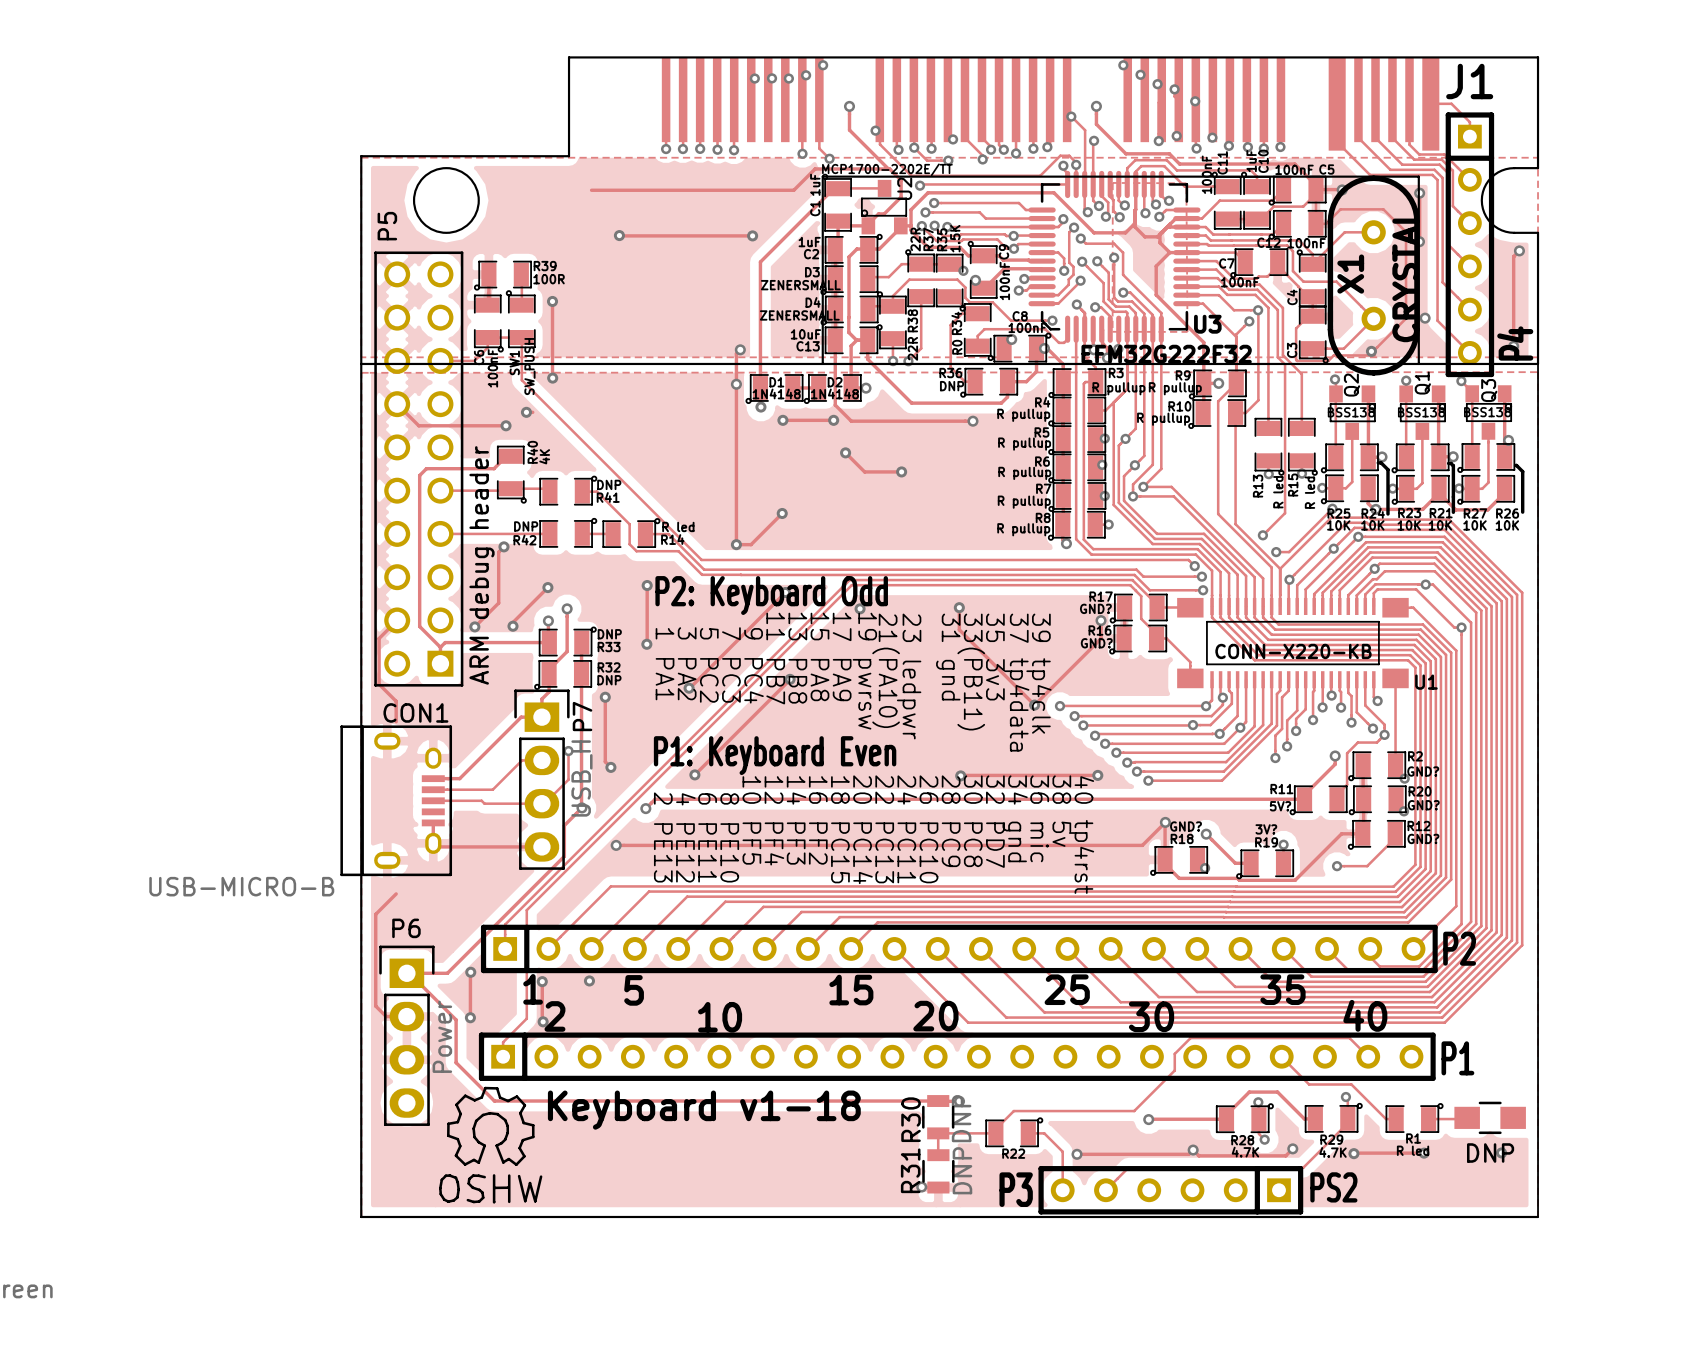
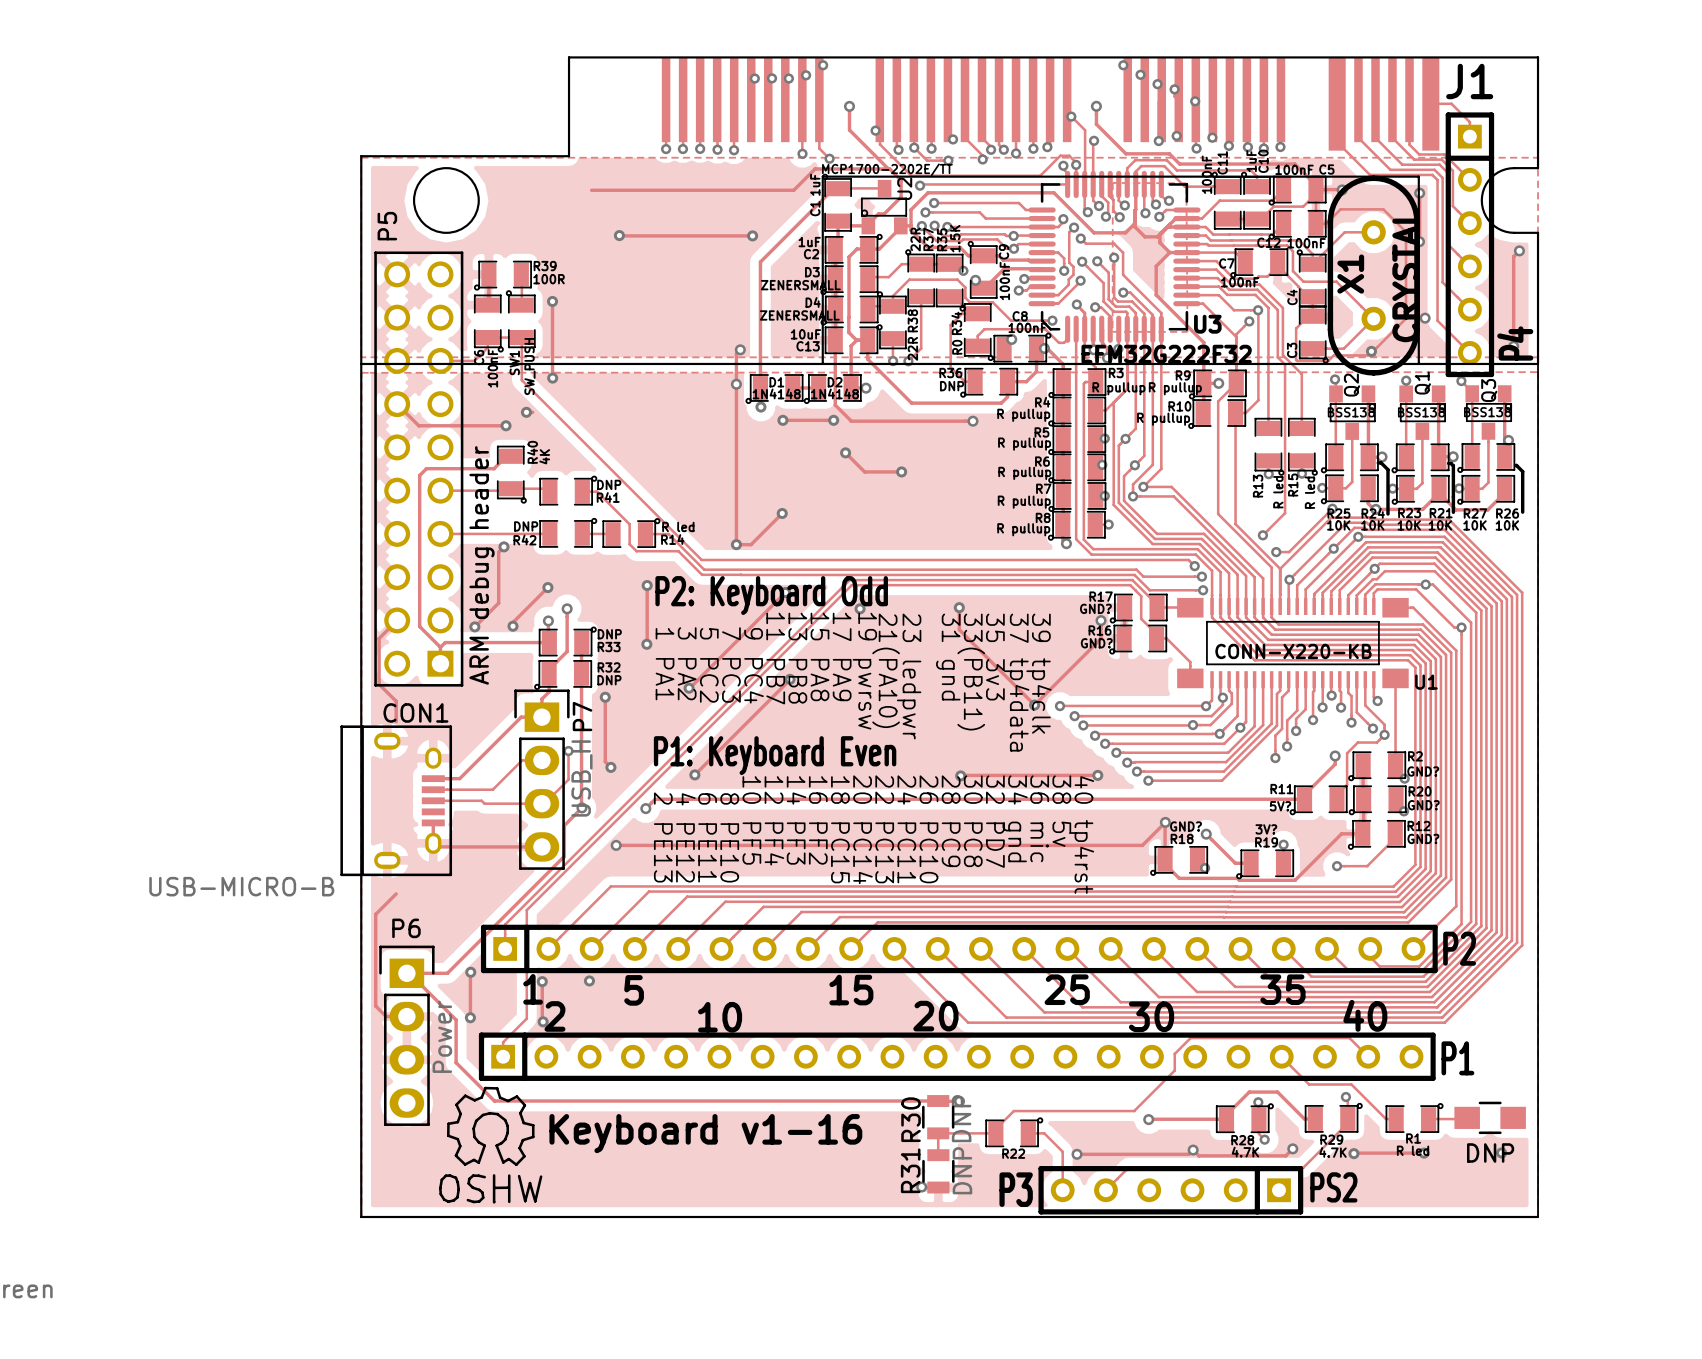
text: Keyboard v1-18 (704, 1110) -> Keyboard v1-16 (705, 1133)

